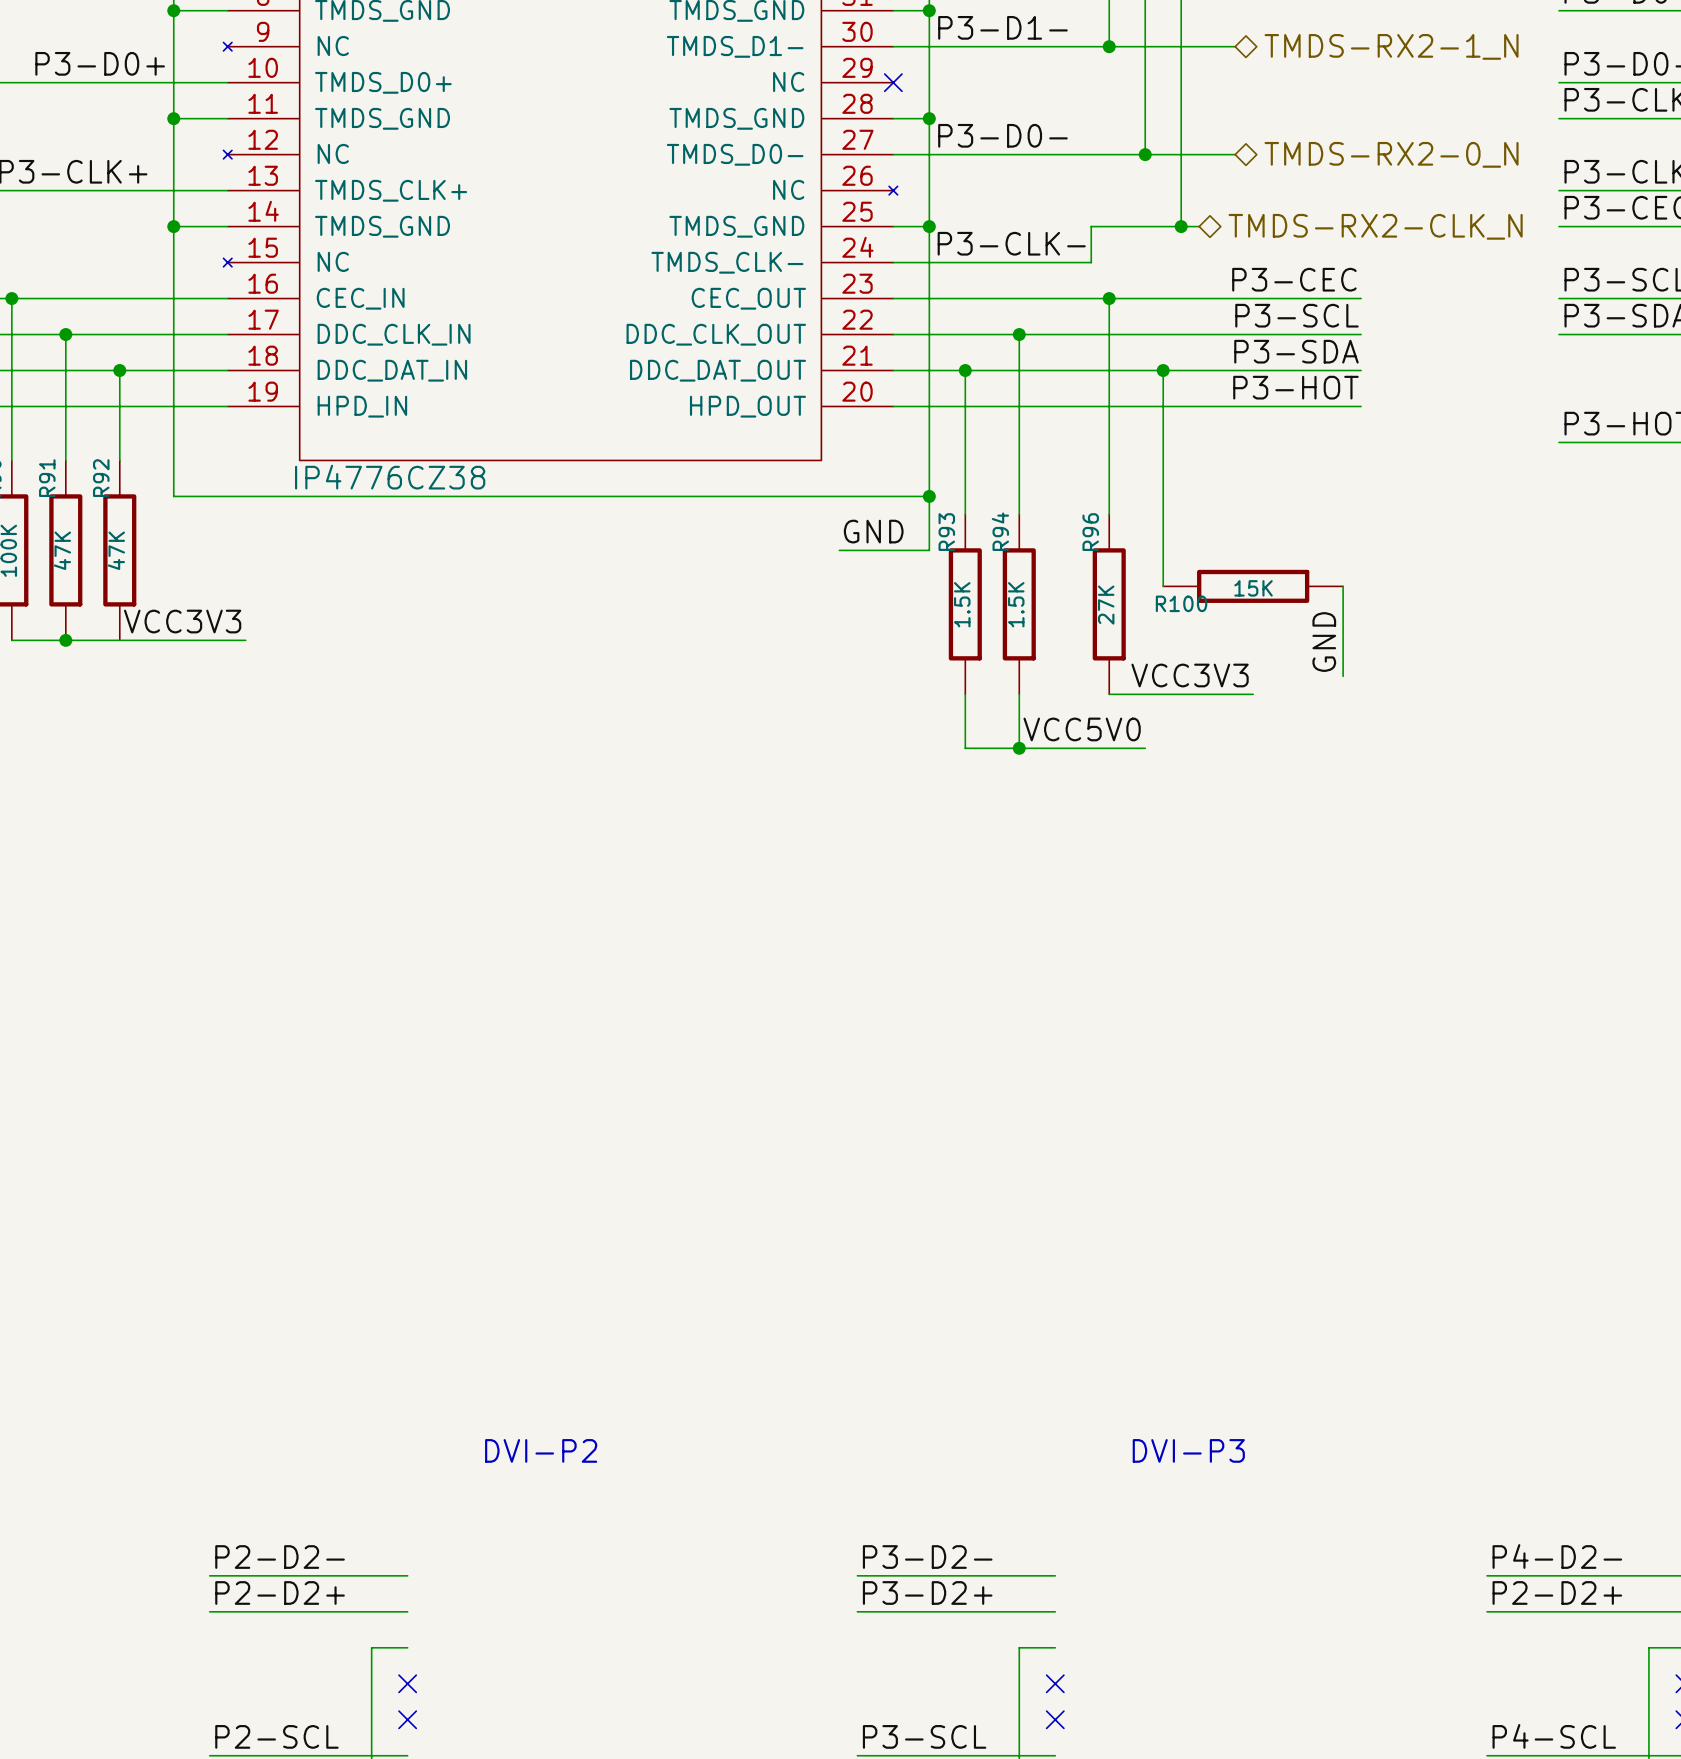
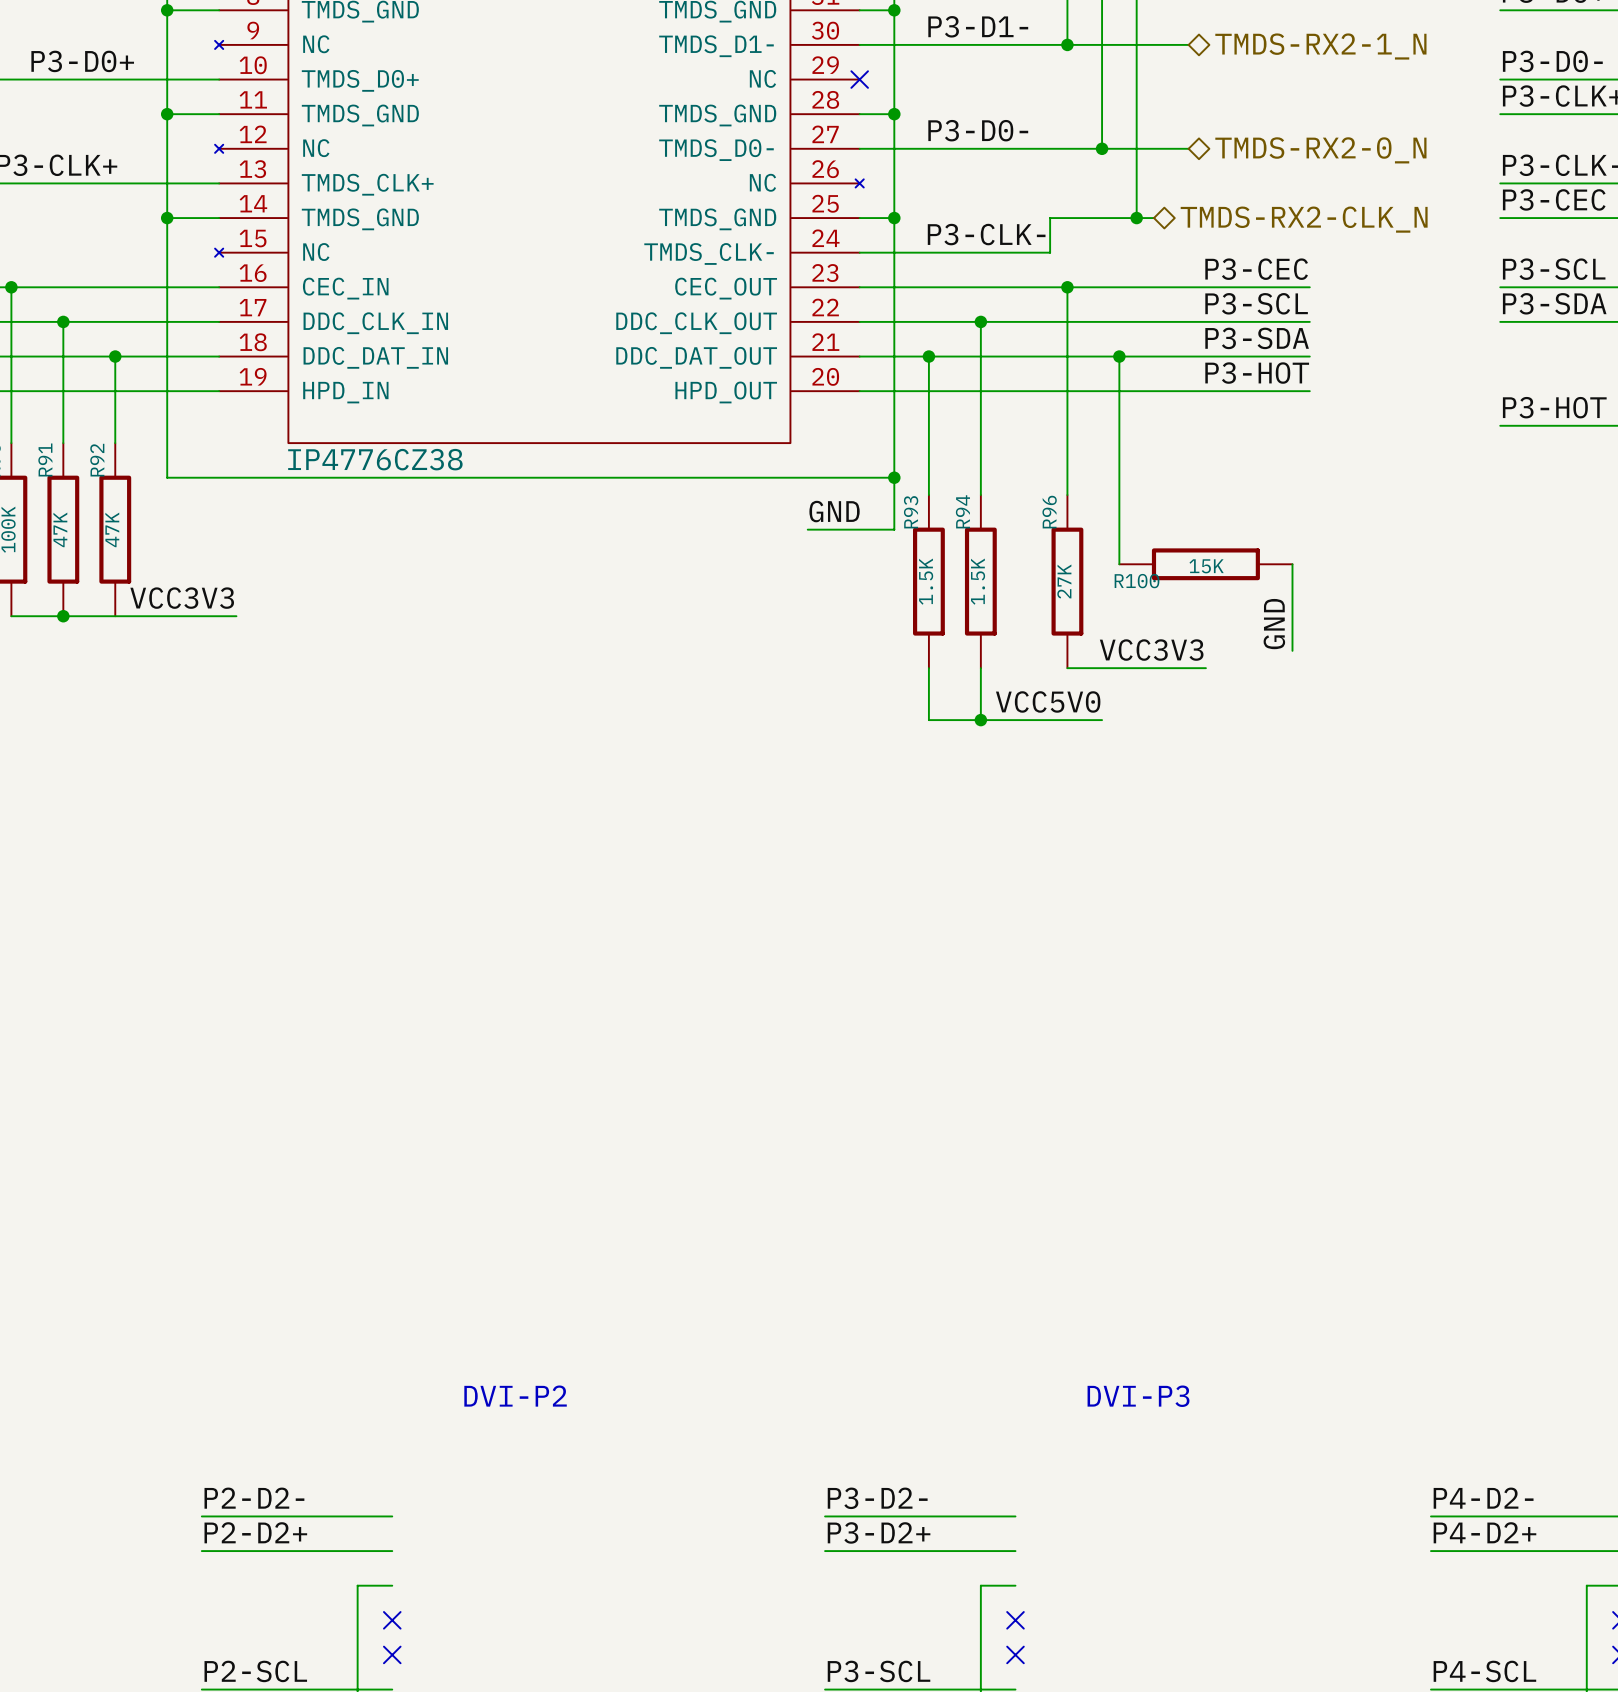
label: P2-D2+ (1557, 1592) -> P4-D2+ (1484, 1532)

